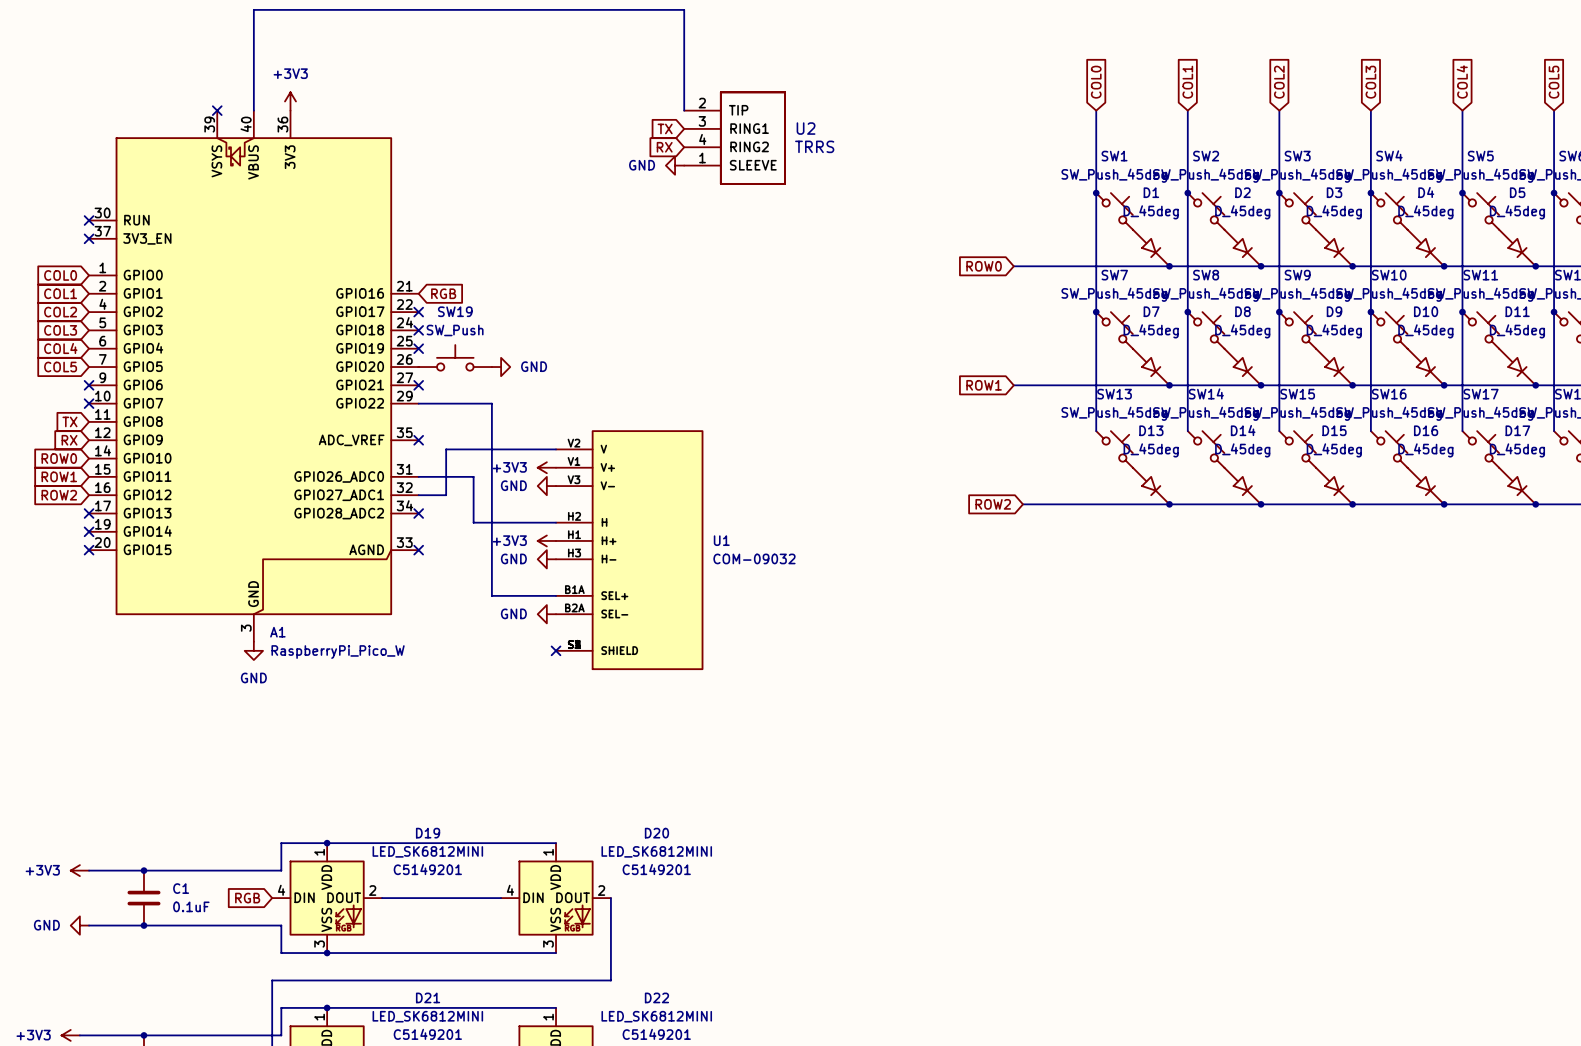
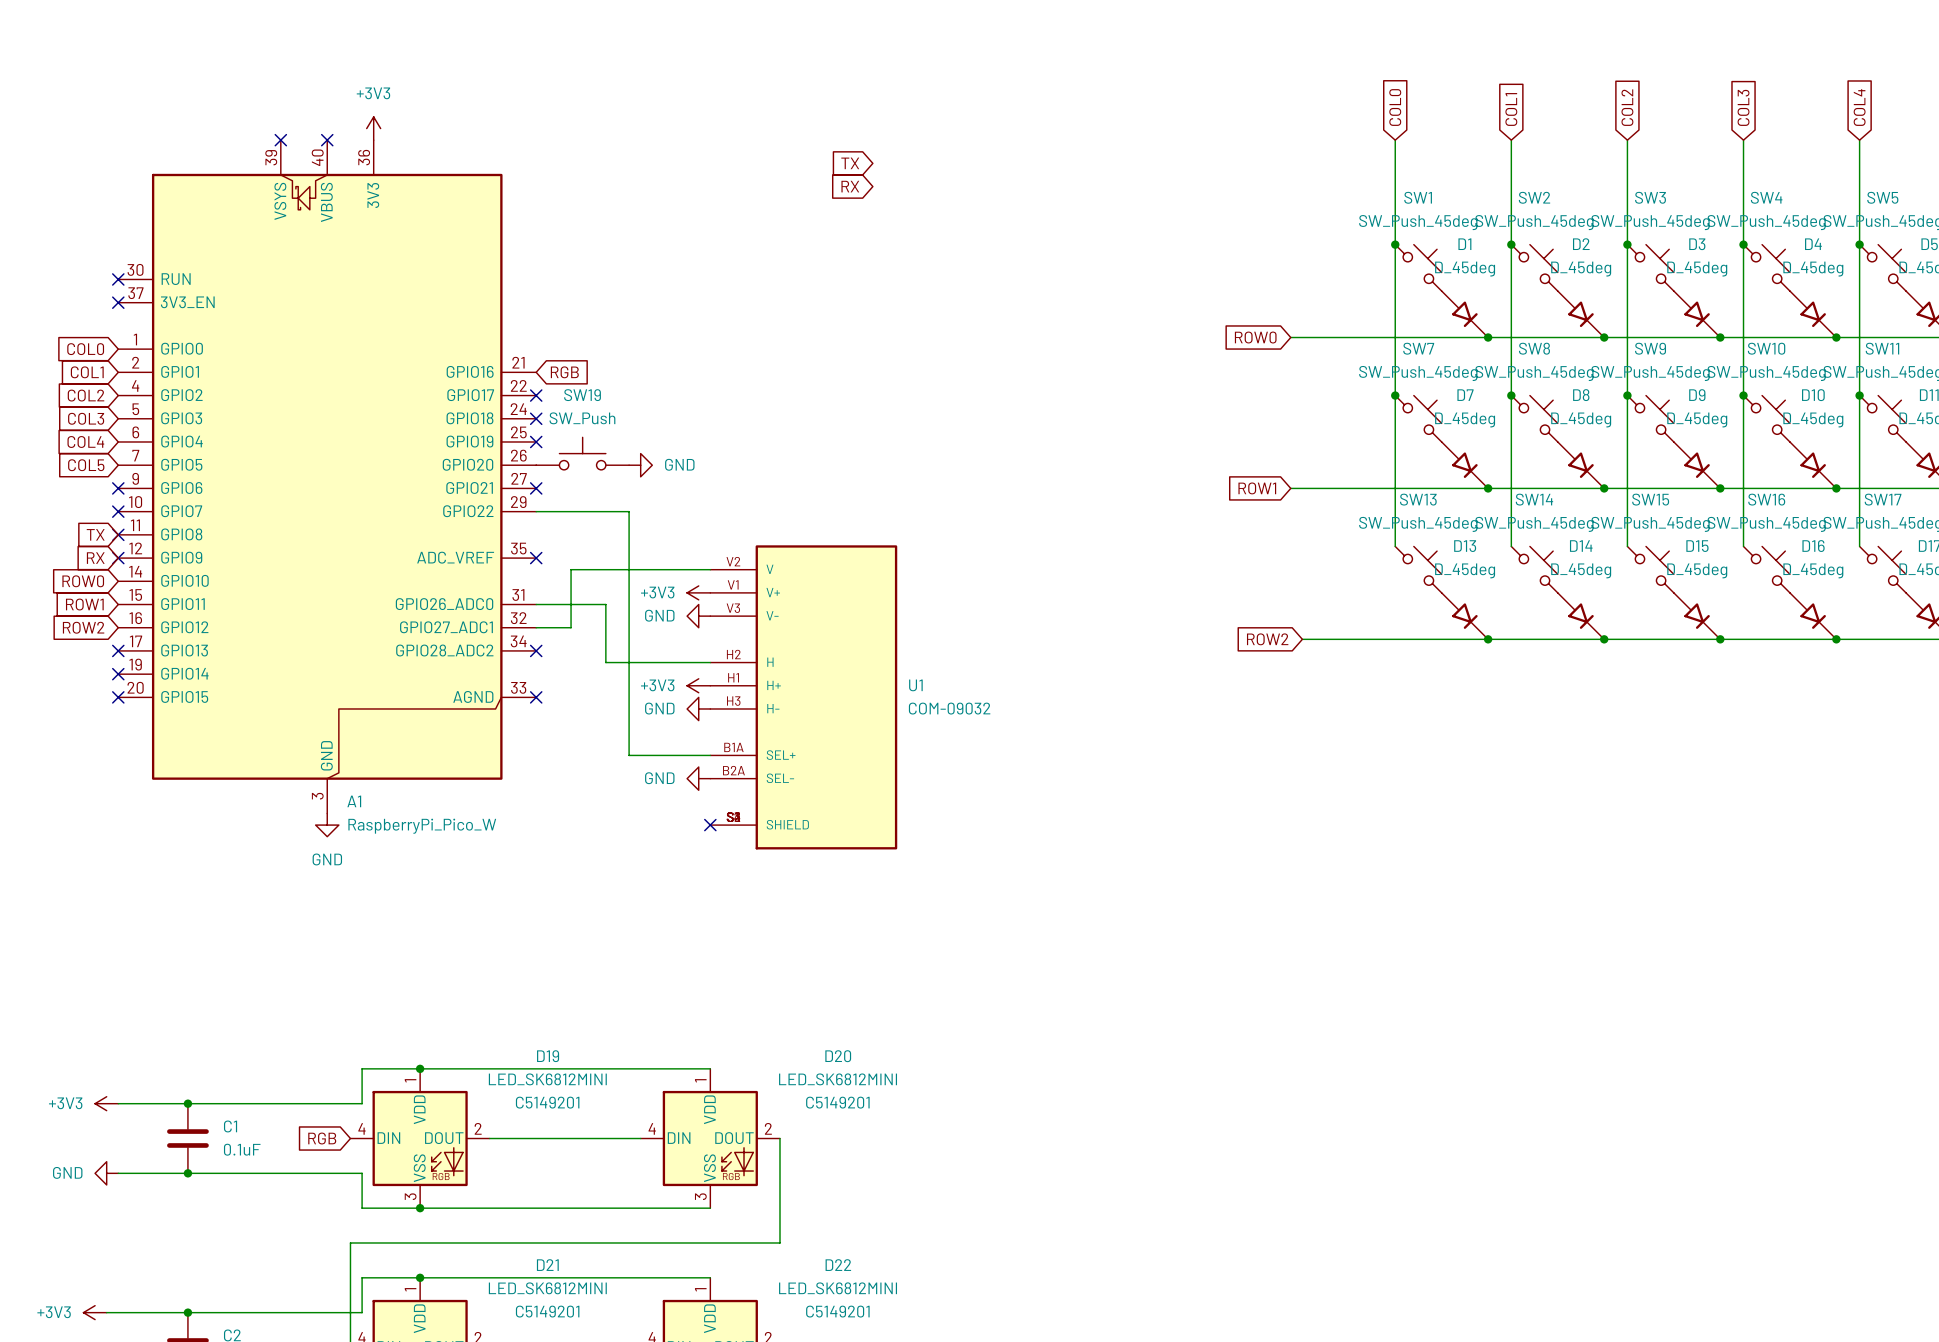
wire: (253, 110) (253, 9) (684, 9) (684, 110) -> none
no-connect mark: none -> (327, 140)
U2: TRRS (734, 138) -> none
power symbol: GND (675, 165) -> none
no-connect mark: none -> (118, 534)
no-connect mark: none -> (118, 558)

